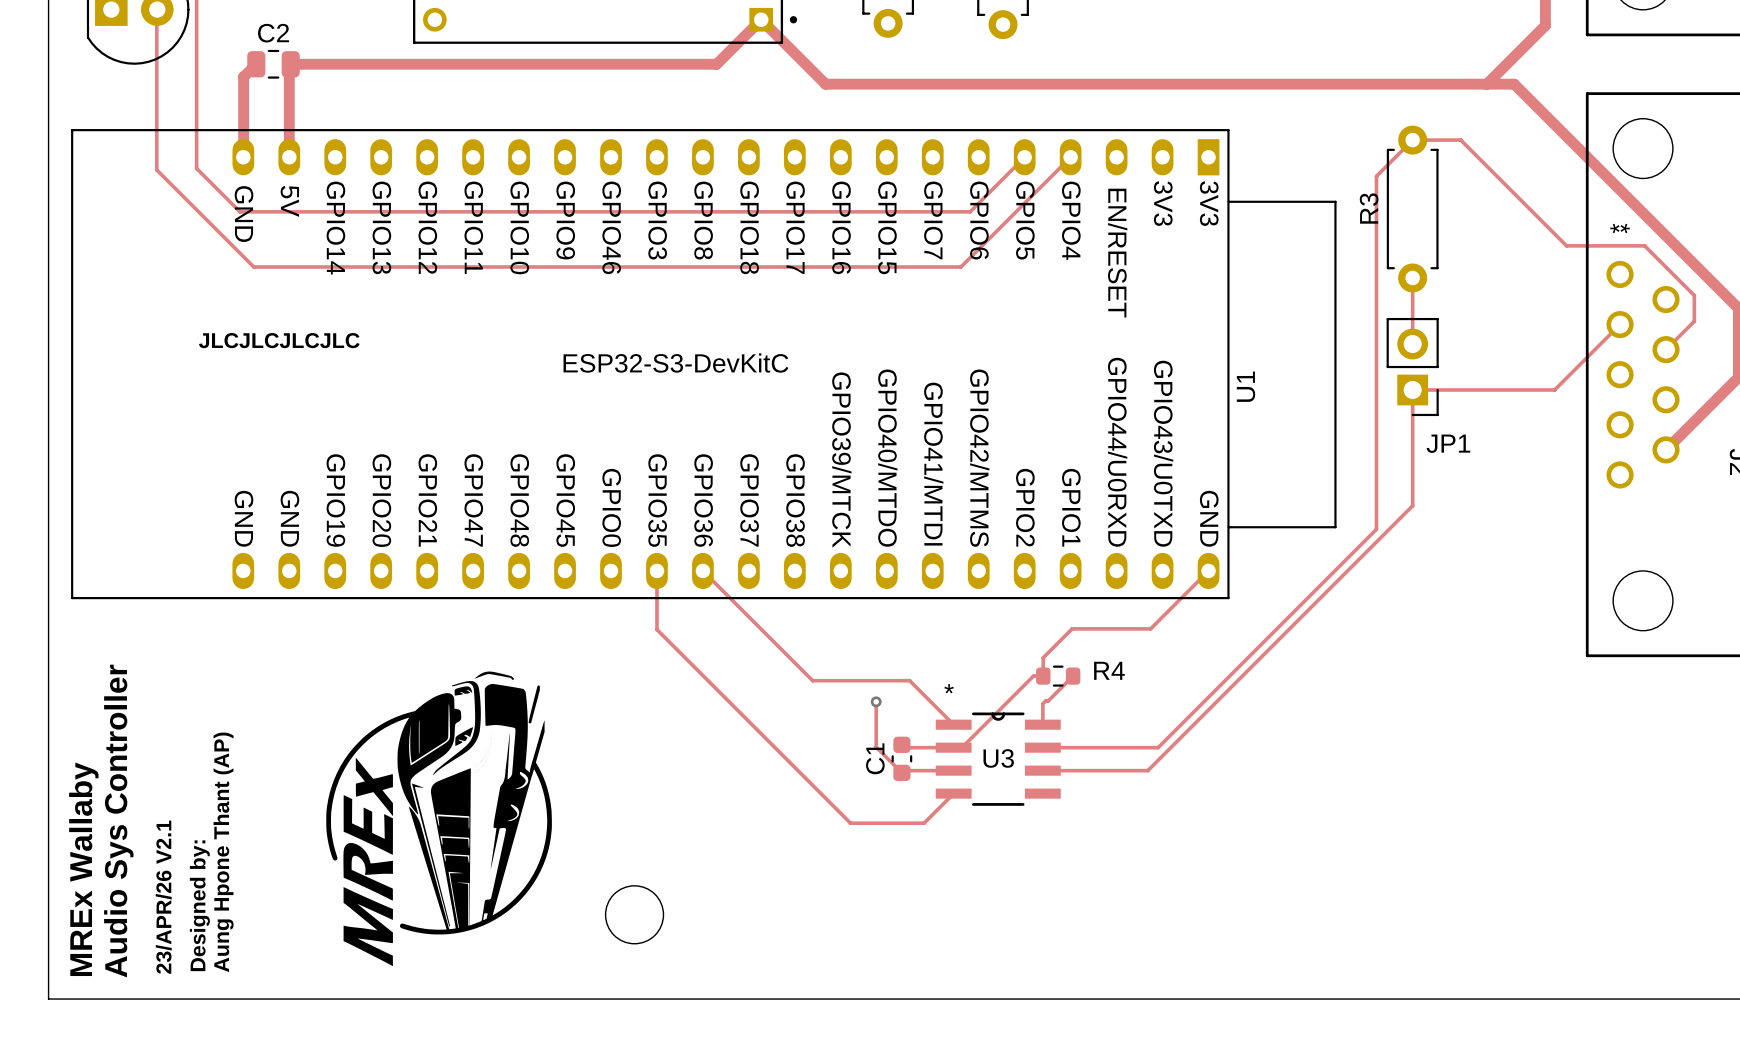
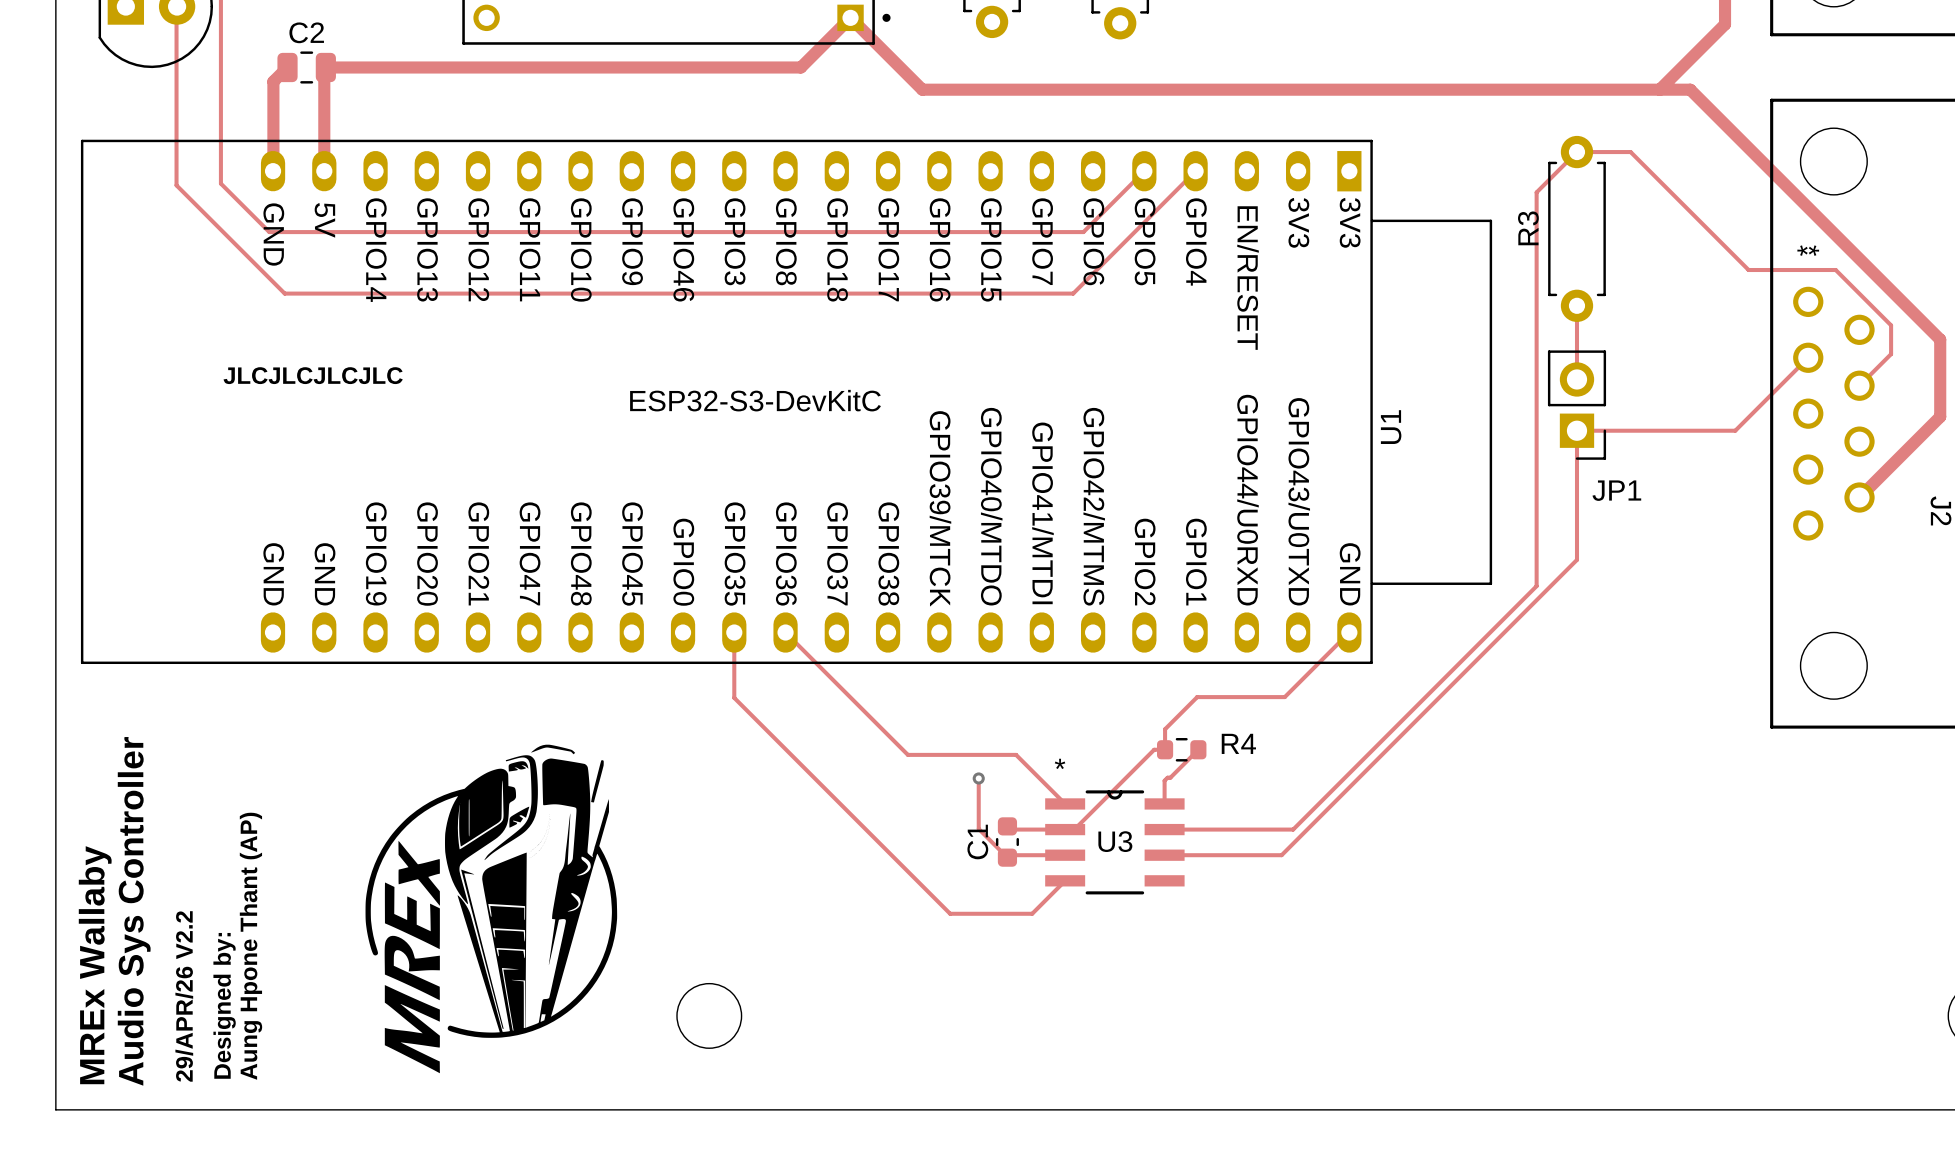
text: 23/APR/26 V2.1 (163, 897) -> 29/APR/26 V2.2 (184, 996)

